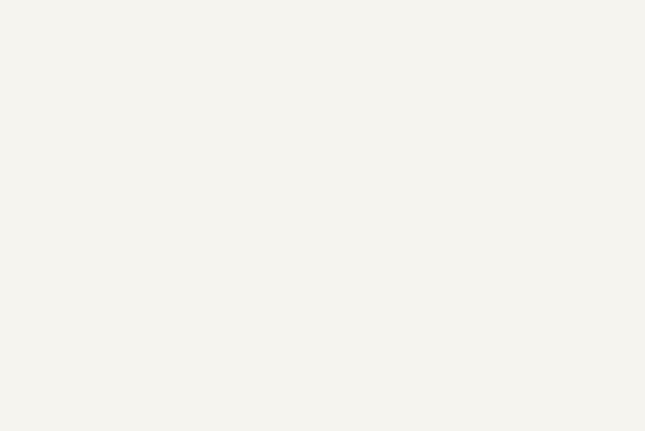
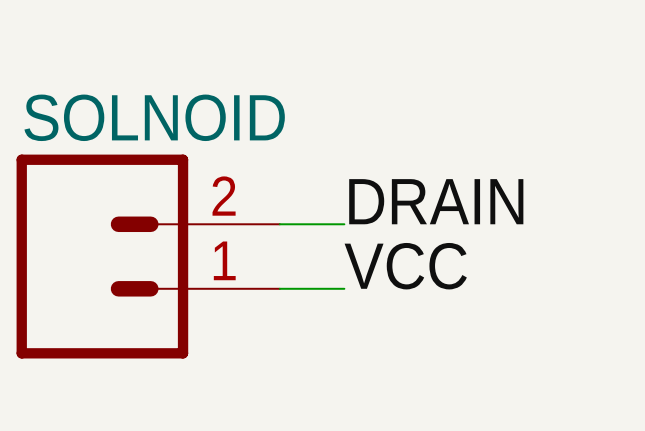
label: none -> DRAIN (436, 201)
wire: none -> (279, 224) (344, 224)
SOLNOID: none -> (148, 256)
label: none -> VCC (405, 266)
wire: none -> (279, 288) (344, 288)

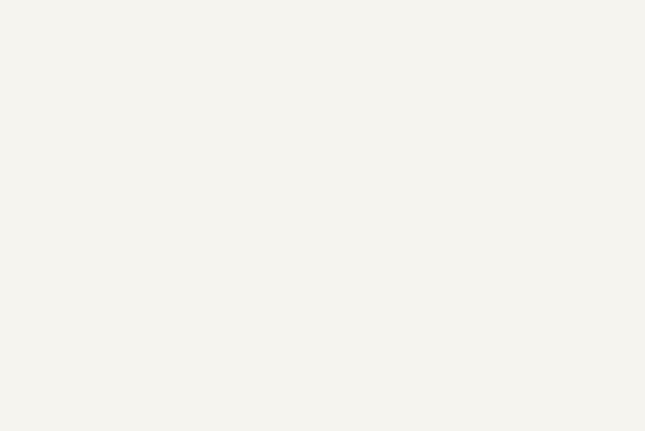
label: DRAIN (436, 201) -> none
wire: (279, 224) (344, 224) -> none
SOLNOID: (148, 256) -> none
label: VCC (405, 266) -> none
wire: (279, 288) (344, 288) -> none

